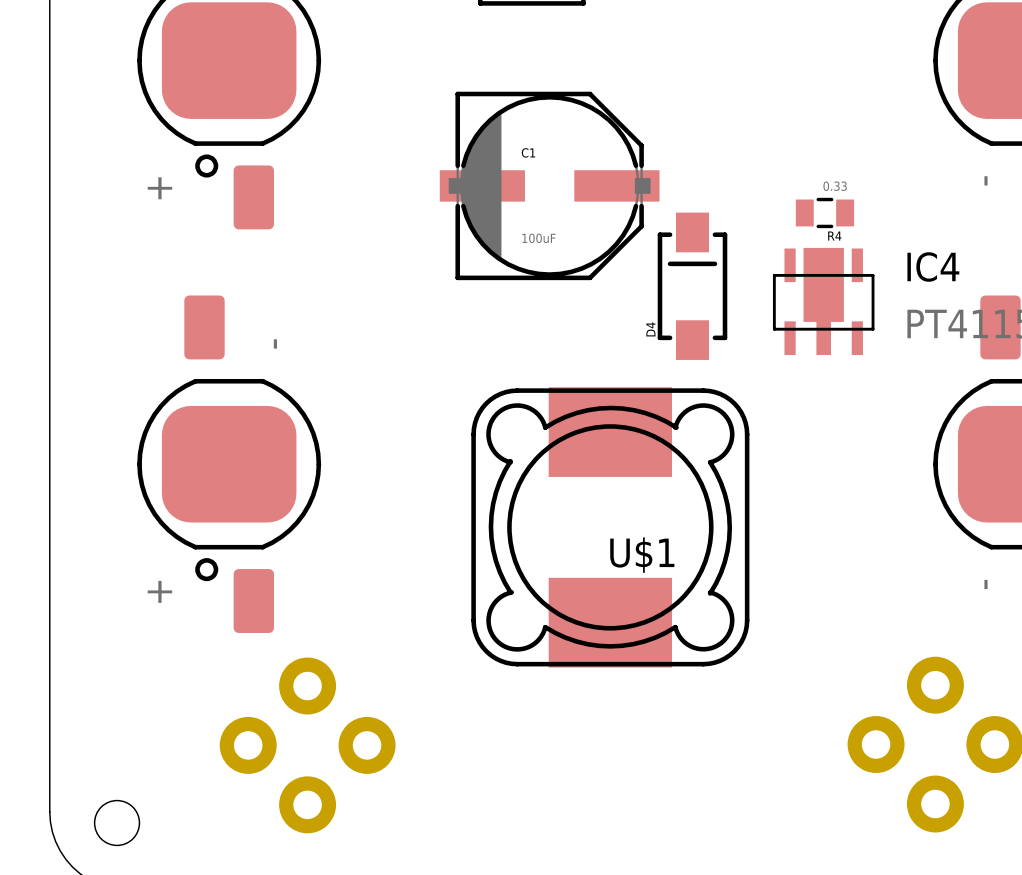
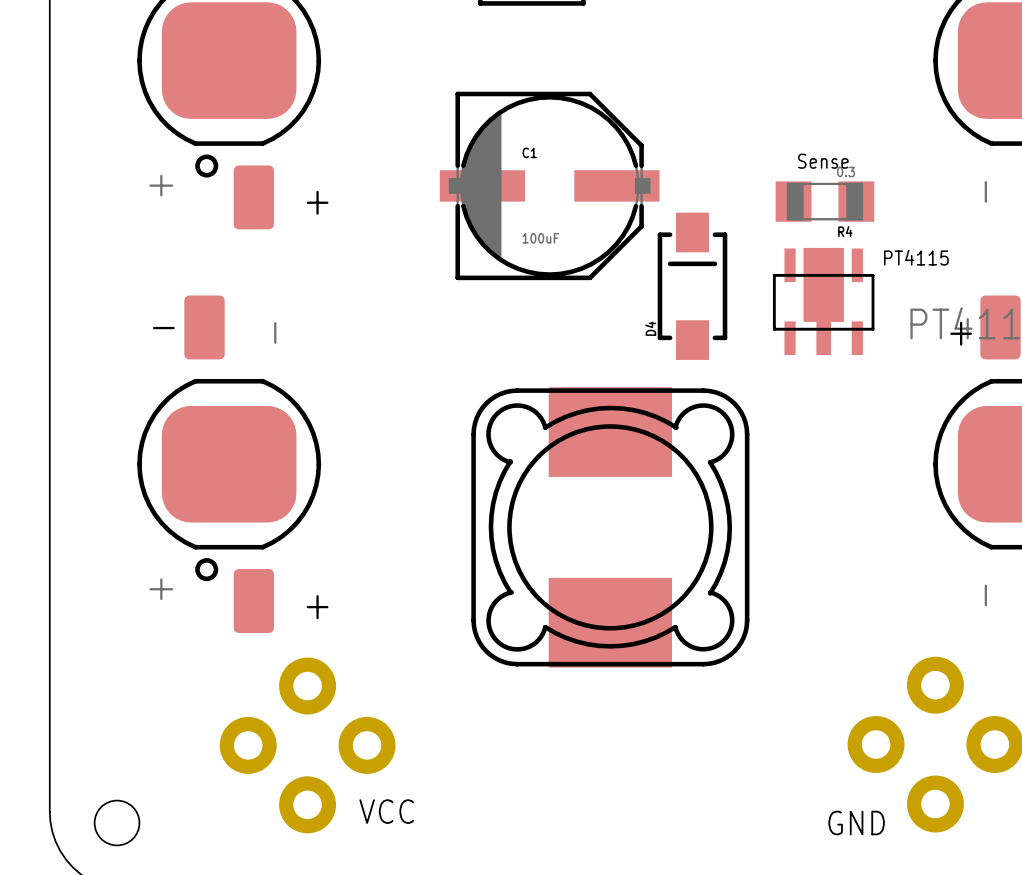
text: none -> Sense (823, 161)
R4 value: 0.33 (835, 186) -> 0.3 (846, 171)
R4 footprint: [795, 197, 855, 229] -> [775, 181, 875, 222]
text: none -> + (317, 202)
text: none -> PT4115 (916, 257)
IC4 name: IC4 (933, 267) -> none
text: none -> - (163, 328)
text: none -> + (961, 333)
U$1 name: U$1 (642, 555) -> none
text: none -> + (317, 607)
text: none -> VCC (386, 811)
text: none -> GND (856, 822)

